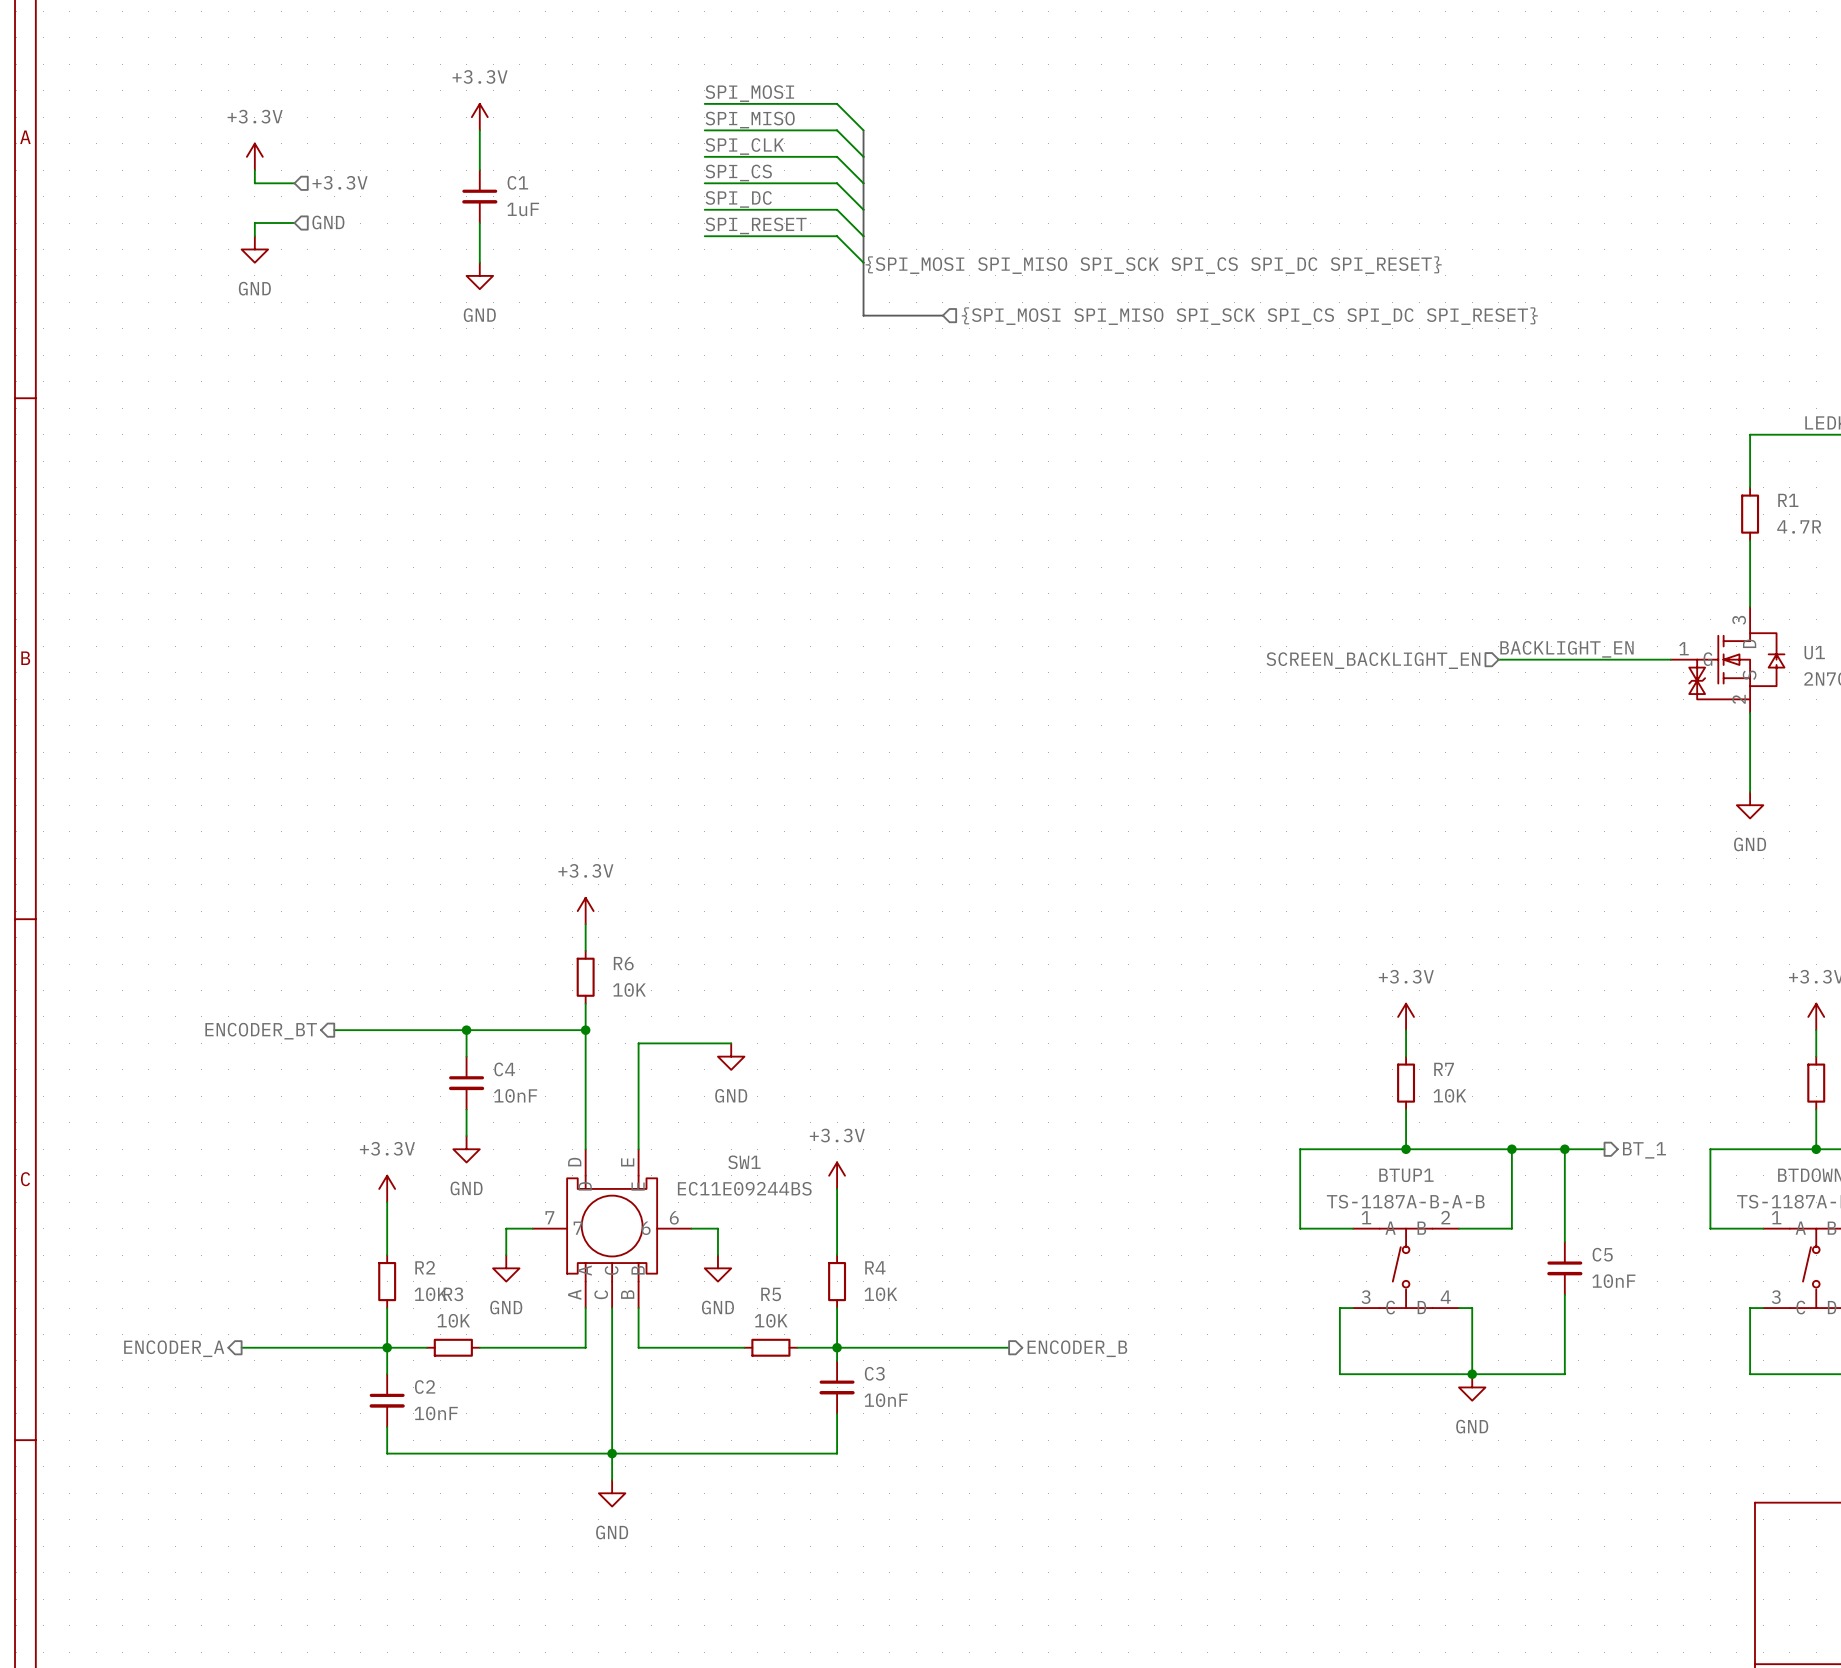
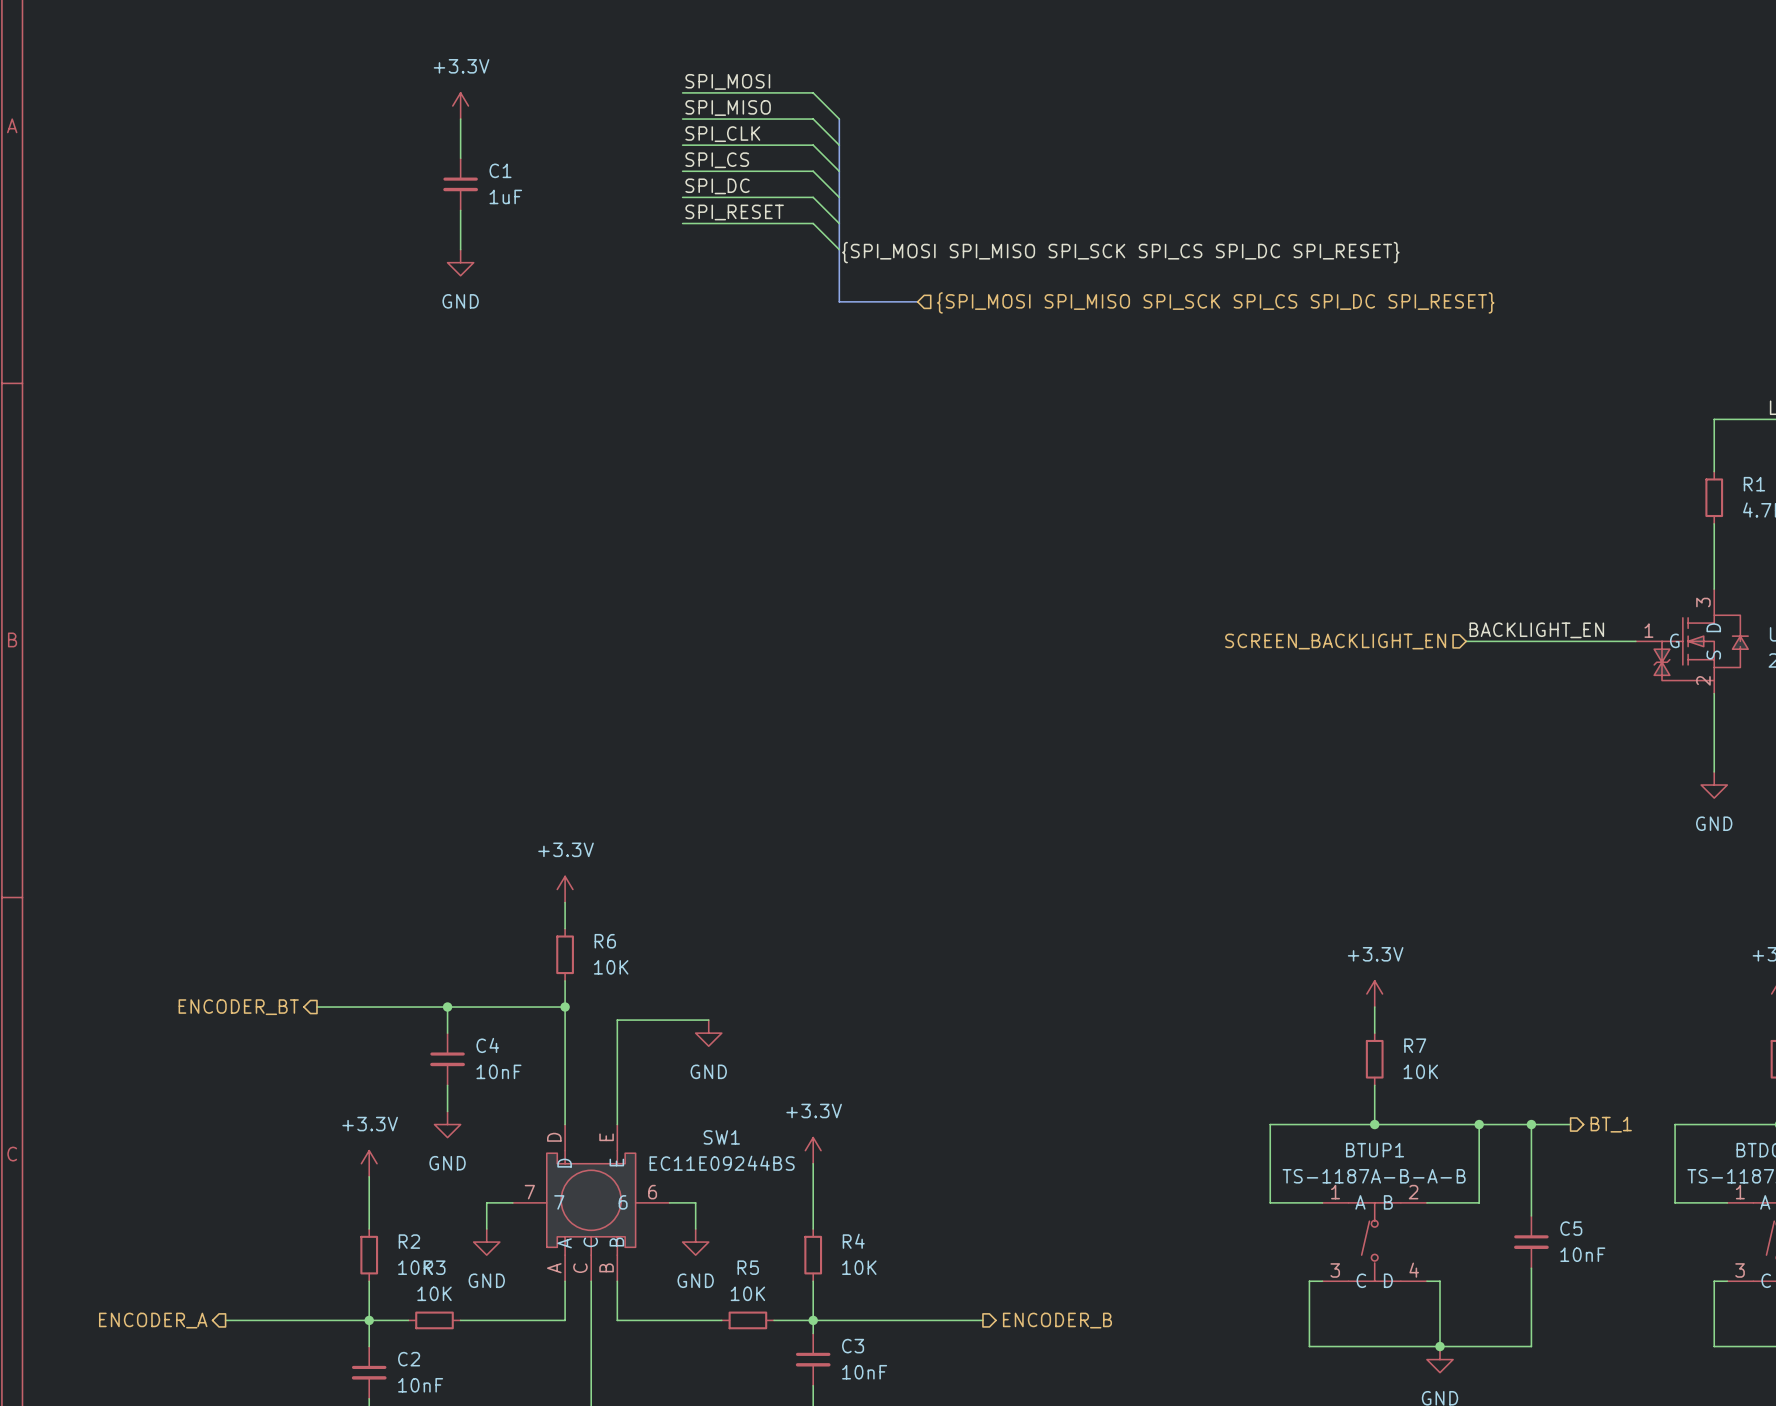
power symbol: +3.3V (254, 156) -> none
wire: (254, 170) (254, 183) (294, 183) -> none
hierarchical label: +3.3V (340, 182) -> none
hierarchical label: GND (328, 222) -> none
wire: (294, 223) (254, 223) (254, 236) -> none
power symbol: GND (254, 249) -> none

